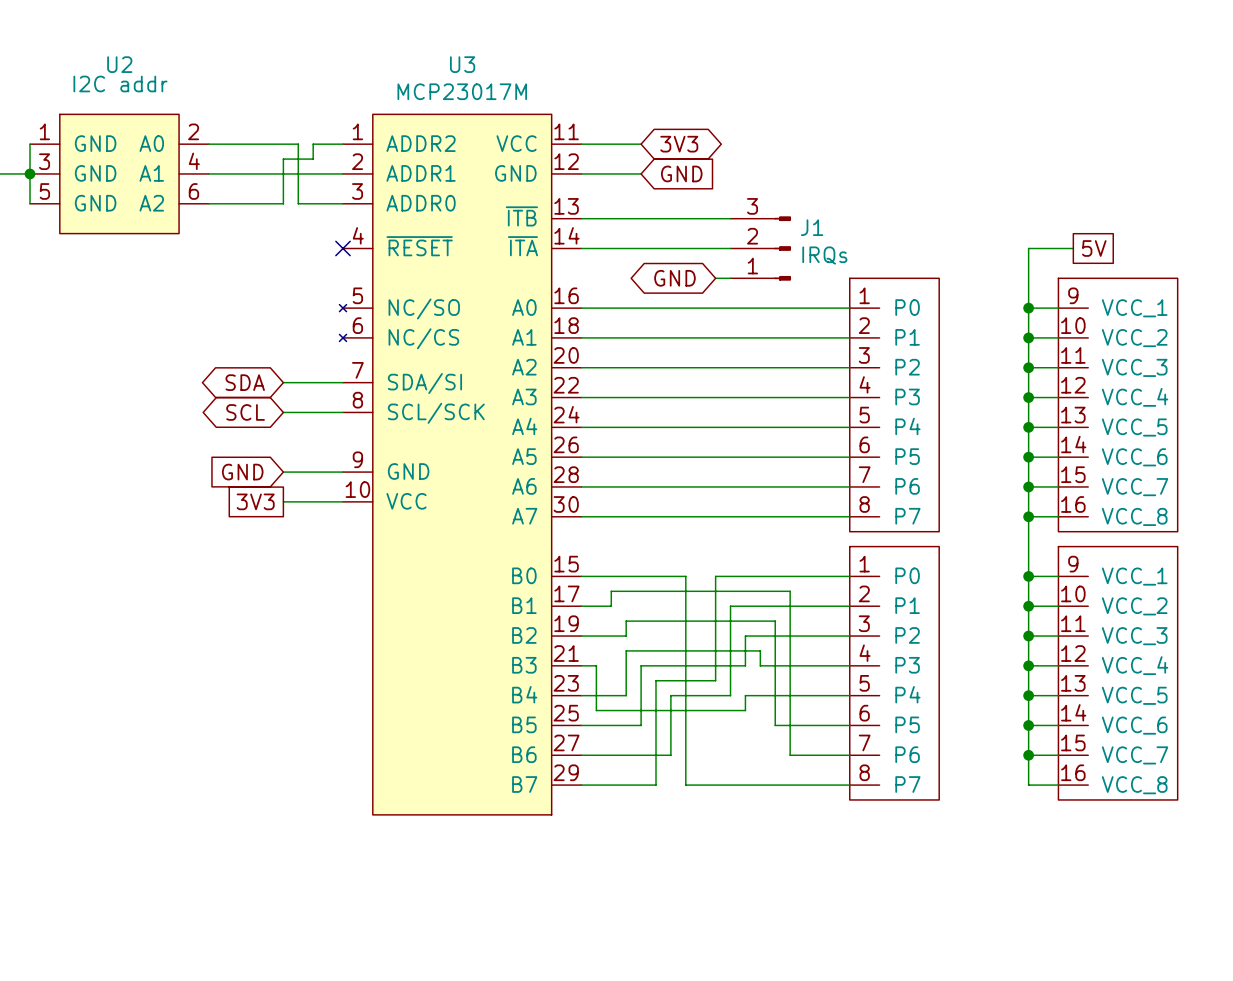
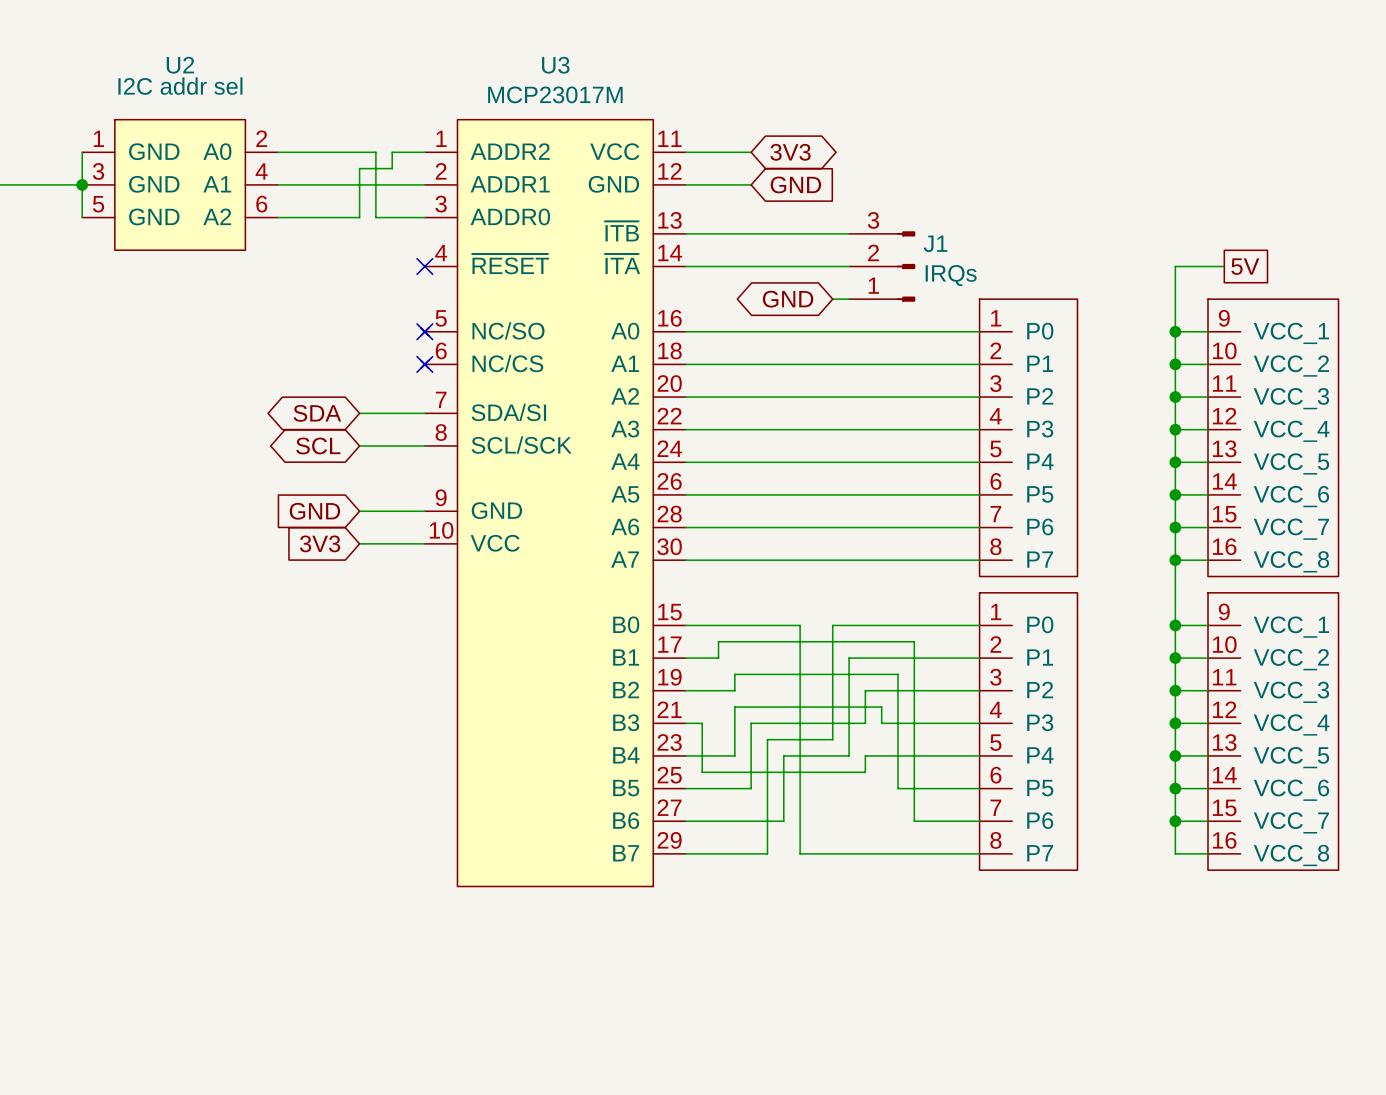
U2 value: I2C addr (120, 83) -> I2C addr sel (180, 86)
no-connect mark: none -> (424, 331)
no-connect mark: none -> (424, 364)
global label shape: passive (255, 501) -> input (320, 543)

